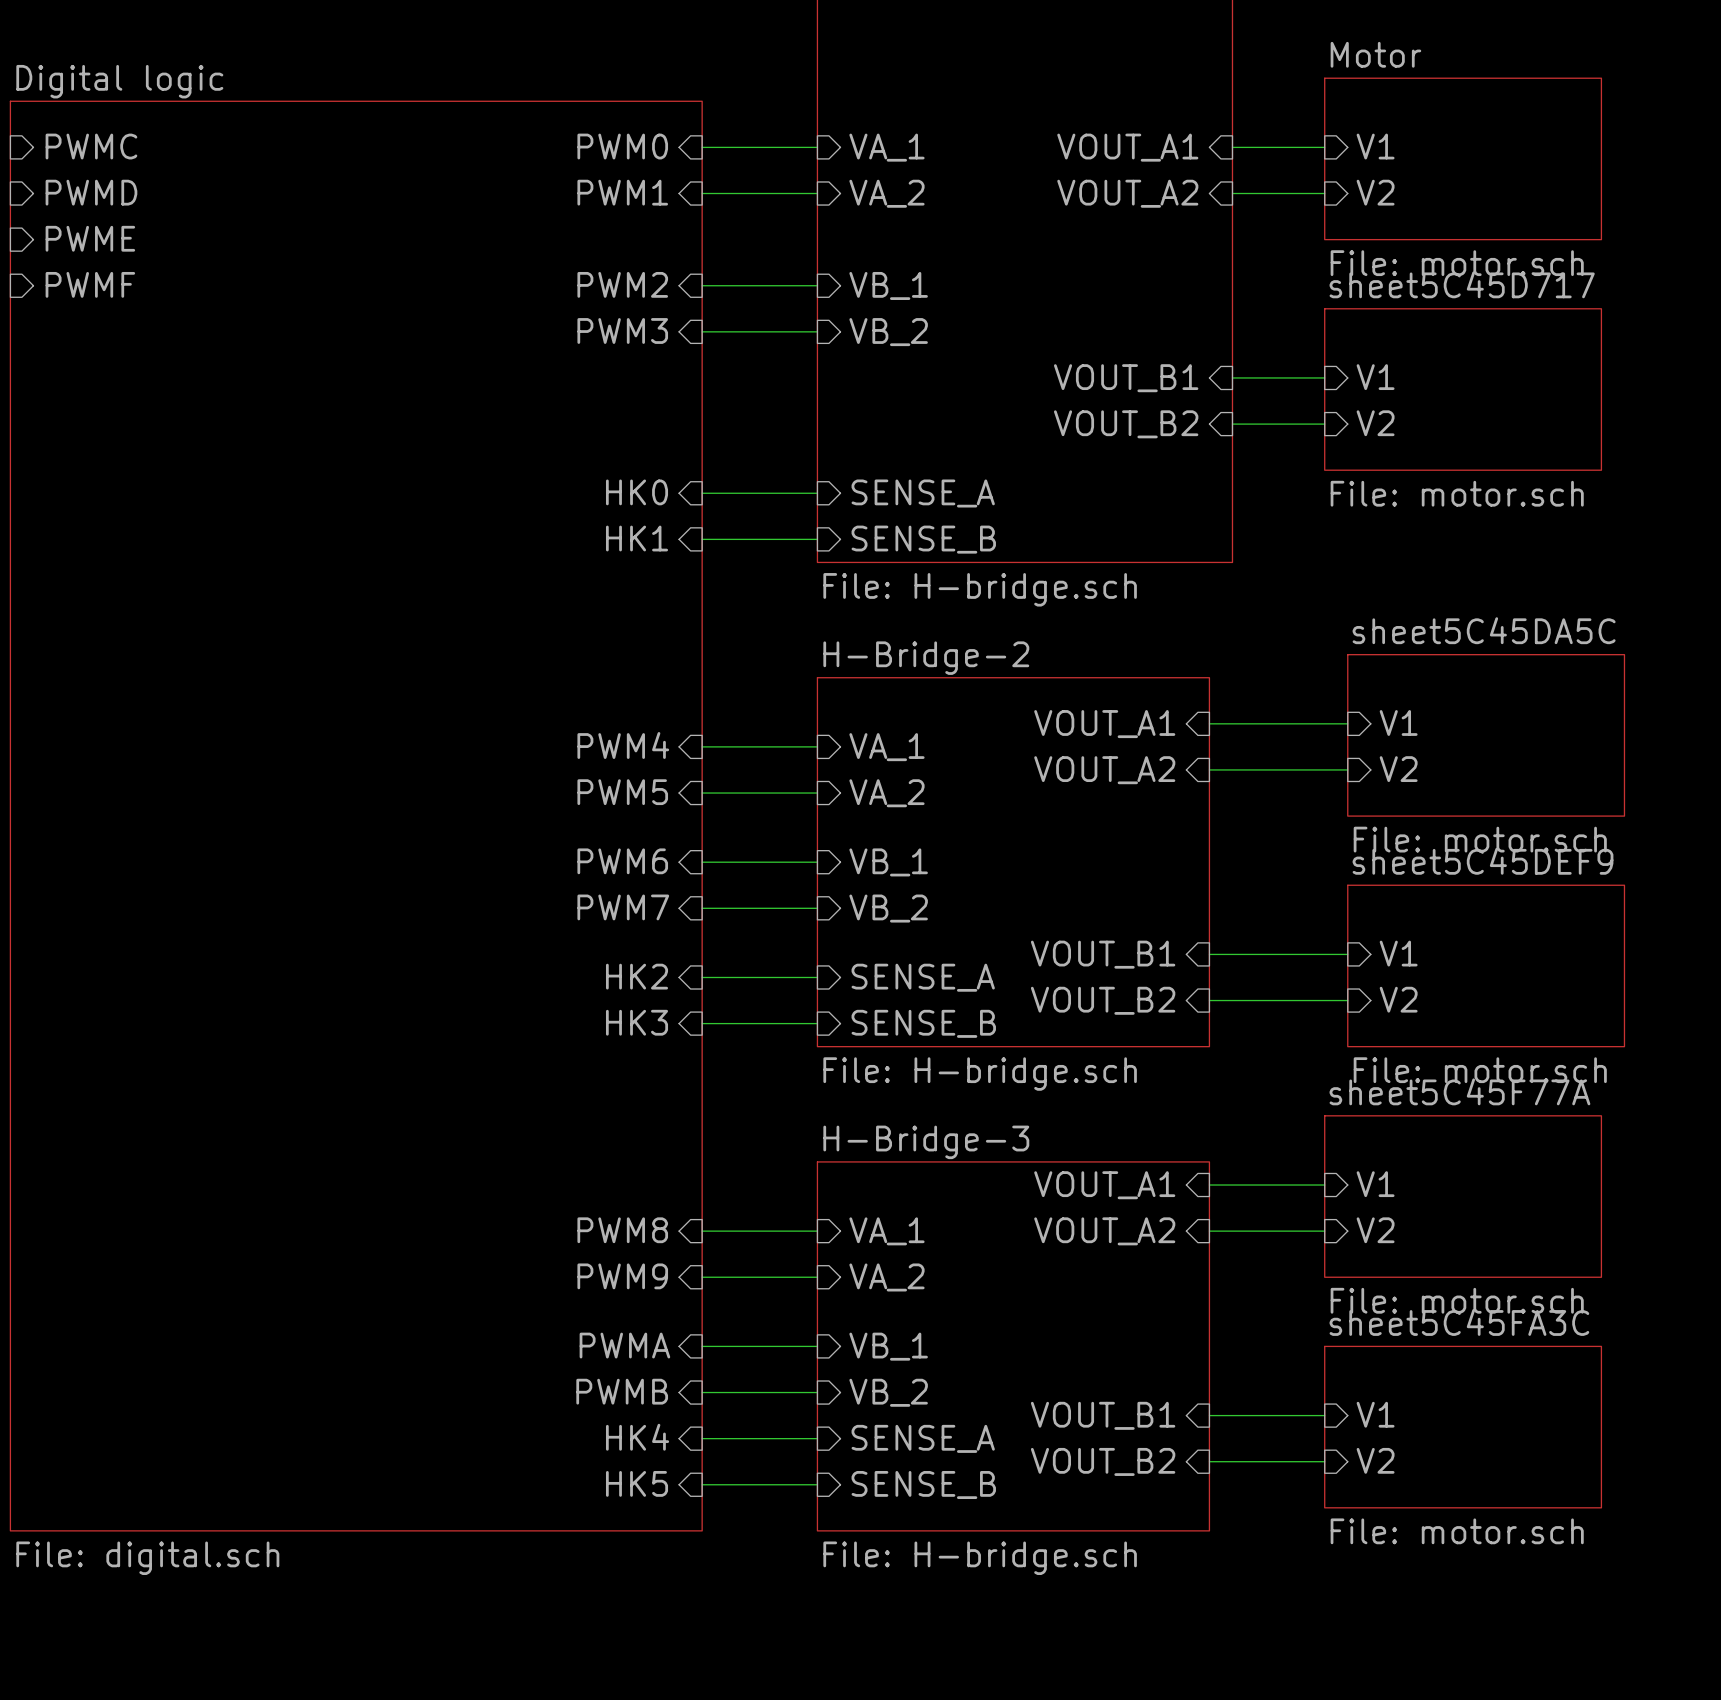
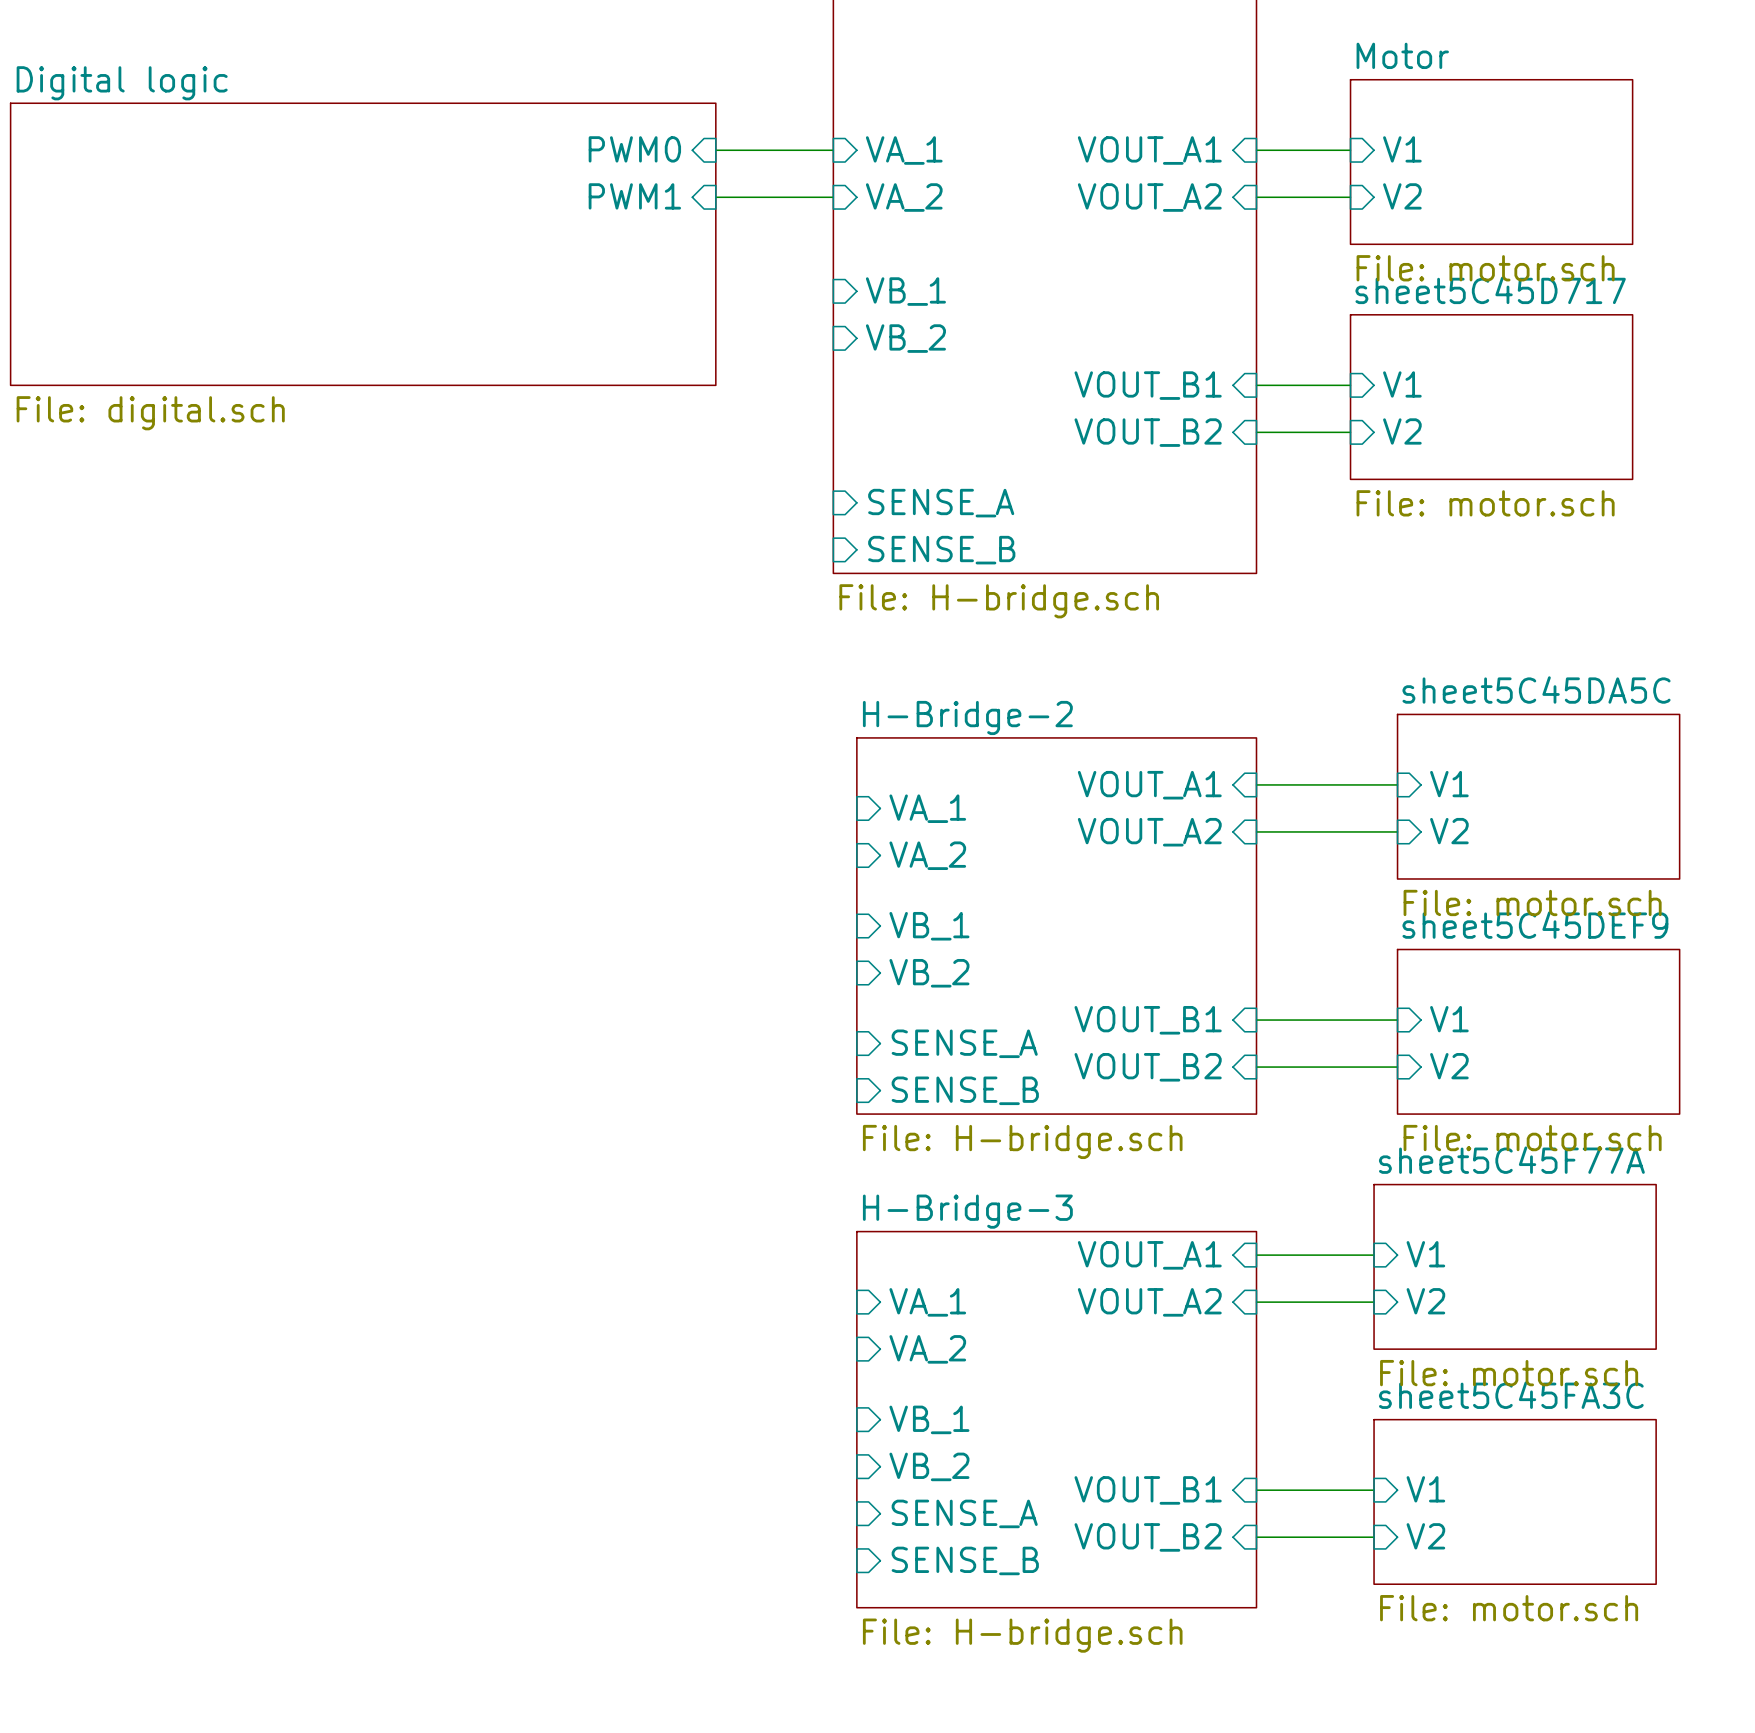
sheet pin: PWMC (91, 146) -> none
sheet pin: PWMD (91, 192) -> none
sheet pin: PWME (90, 238) -> none
sheet Digital logic: none -> File: digital.sch (363, 244)
sheet pin: PWMF (90, 284) -> none
sheet pin: PWM2 (622, 284) -> none
wire: (702, 285) (817, 285) -> none
sheet pin: PWM3 (622, 330) -> none
wire: (702, 331) (817, 331) -> none
sheet pin: HK0 (637, 492) -> none
wire: (702, 493) (817, 493) -> none
sheet pin: HK1 (637, 538) -> none
wire: (702, 539) (817, 539) -> none
sheet pin position: V1 (1398, 722) -> V1 (1449, 784)
wire: (1209, 723) (1347, 723) -> (1256, 831) (1397, 831)
sheet pin position: VOUT_A1 (1104, 724) -> VOUT_A1 (1149, 785)
sheet sheet5C45DA5C position: (1486, 735) -> (1538, 796)
sheet pin: PWM4 (623, 745) -> none
wire: (702, 746) (817, 746) -> none
sheet pin position: VA_1 (886, 747) -> VA_1 (927, 808)
wire: (1209, 769) (1232, 769) -> (1374, 784) (1397, 784)
sheet pin position: V2 (1398, 769) -> V2 (1449, 831)
sheet pin position: VOUT_A2 (1104, 770) -> VOUT_A2 (1149, 832)
sheet pin: PWM5 (622, 792) -> none
wire: (702, 793) (817, 793) -> none
sheet pin position: VA_2 (886, 793) -> VA_2 (927, 855)
sheet Digital logic: File: digital.sch (356, 816) -> none
sheet pin: PWM6 (622, 861) -> none
wire: (702, 862) (817, 862) -> none
sheet pin position: VB_1 (888, 862) -> VB_1 (929, 926)
sheet H-Bridge-2 position: (1013, 862) -> (1056, 926)
sheet pin: PWM7 (623, 907) -> none
wire: (702, 908) (817, 908) -> none
sheet pin position: VB_2 (888, 908) -> VB_2 (929, 973)
sheet pin position: V1 (1398, 953) -> V1 (1449, 1019)
sheet pin position: VOUT_B1 (1103, 954) -> VOUT_B1 (1148, 1020)
wire: (1209, 954) (1347, 954) -> (1256, 1067) (1397, 1067)
sheet sheet5C45DEF9 position: (1486, 965) -> (1538, 1031)
sheet pin: HK2 (637, 976) -> none
wire: (702, 977) (817, 977) -> none
sheet pin position: SENSE_A (923, 977) -> SENSE_A (964, 1043)
sheet pin position: V2 (1398, 999) -> V2 (1449, 1066)
sheet pin position: VOUT_B2 (1103, 1000) -> VOUT_B2 (1148, 1067)
wire: (1209, 1000) (1232, 1000) -> (1374, 1020) (1397, 1020)
sheet pin: HK3 (637, 1022) -> none
wire: (702, 1023) (817, 1023) -> none
sheet pin position: SENSE_B (923, 1023) -> SENSE_B (965, 1090)
sheet pin position: V1 (1375, 1184) -> V1 (1425, 1254)
sheet pin position: VOUT_A1 (1104, 1185) -> VOUT_A1 (1149, 1255)
wire: (1209, 1185) (1324, 1185) -> (1256, 1302) (1374, 1302)
sheet sheet5C45F77A position: (1463, 1196) -> (1515, 1266)
sheet pin: PWM8 (622, 1230) -> none
sheet pin position: V2 (1375, 1230) -> V2 (1425, 1301)
wire: (702, 1231) (817, 1231) -> none
sheet pin position: VA_1 (886, 1231) -> VA_1 (927, 1302)
sheet pin position: VOUT_A2 (1104, 1231) -> VOUT_A2 (1149, 1302)
wire: (1209, 1231) (1232, 1231) -> (1350, 1255) (1374, 1255)
sheet pin: PWM9 (622, 1276) -> none
wire: (702, 1277) (817, 1277) -> none
sheet pin position: VA_2 (886, 1277) -> VA_2 (927, 1349)
sheet pin: PWMA (624, 1345) -> none
wire: (702, 1346) (817, 1346) -> none
sheet pin position: VB_1 (888, 1346) -> VB_1 (929, 1419)
sheet H-Bridge-3 position: (1013, 1346) -> (1056, 1419)
sheet pin: PWMB (622, 1391) -> none
wire: (702, 1392) (817, 1392) -> none
sheet pin position: VB_2 (888, 1392) -> VB_2 (929, 1466)
sheet pin position: V1 (1375, 1414) -> V1 (1425, 1489)
sheet pin position: VOUT_B1 (1103, 1415) -> VOUT_B1 (1148, 1490)
wire: (1209, 1415) (1324, 1415) -> (1256, 1537) (1374, 1537)
sheet sheet5C45FA3C position: (1463, 1427) -> (1515, 1501)
sheet pin: HK4 (637, 1437) -> none
wire: (702, 1438) (817, 1438) -> none
sheet pin position: SENSE_A (923, 1438) -> SENSE_A (964, 1513)
sheet pin position: V2 (1375, 1460) -> V2 (1425, 1536)
sheet pin position: VOUT_B2 (1103, 1461) -> VOUT_B2 (1148, 1537)
wire: (1209, 1461) (1232, 1461) -> (1350, 1490) (1374, 1490)
sheet pin: HK5 (637, 1483) -> none
wire: (702, 1484) (817, 1484) -> none
sheet pin position: SENSE_B (923, 1485) -> SENSE_B (965, 1560)

